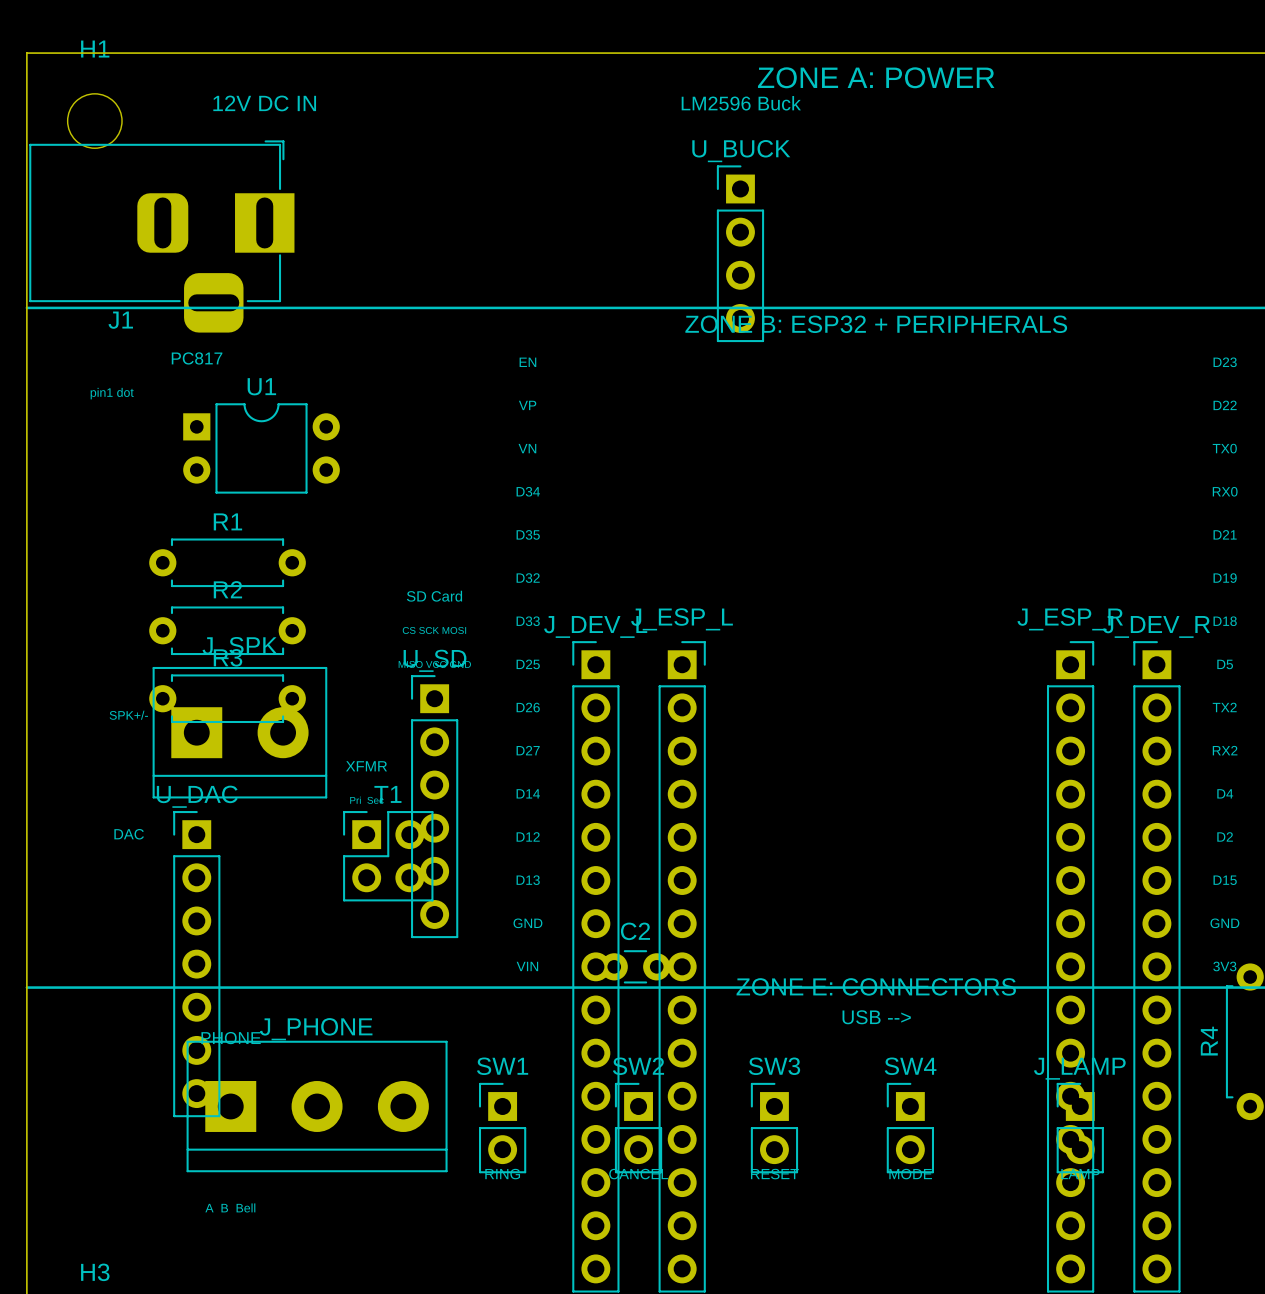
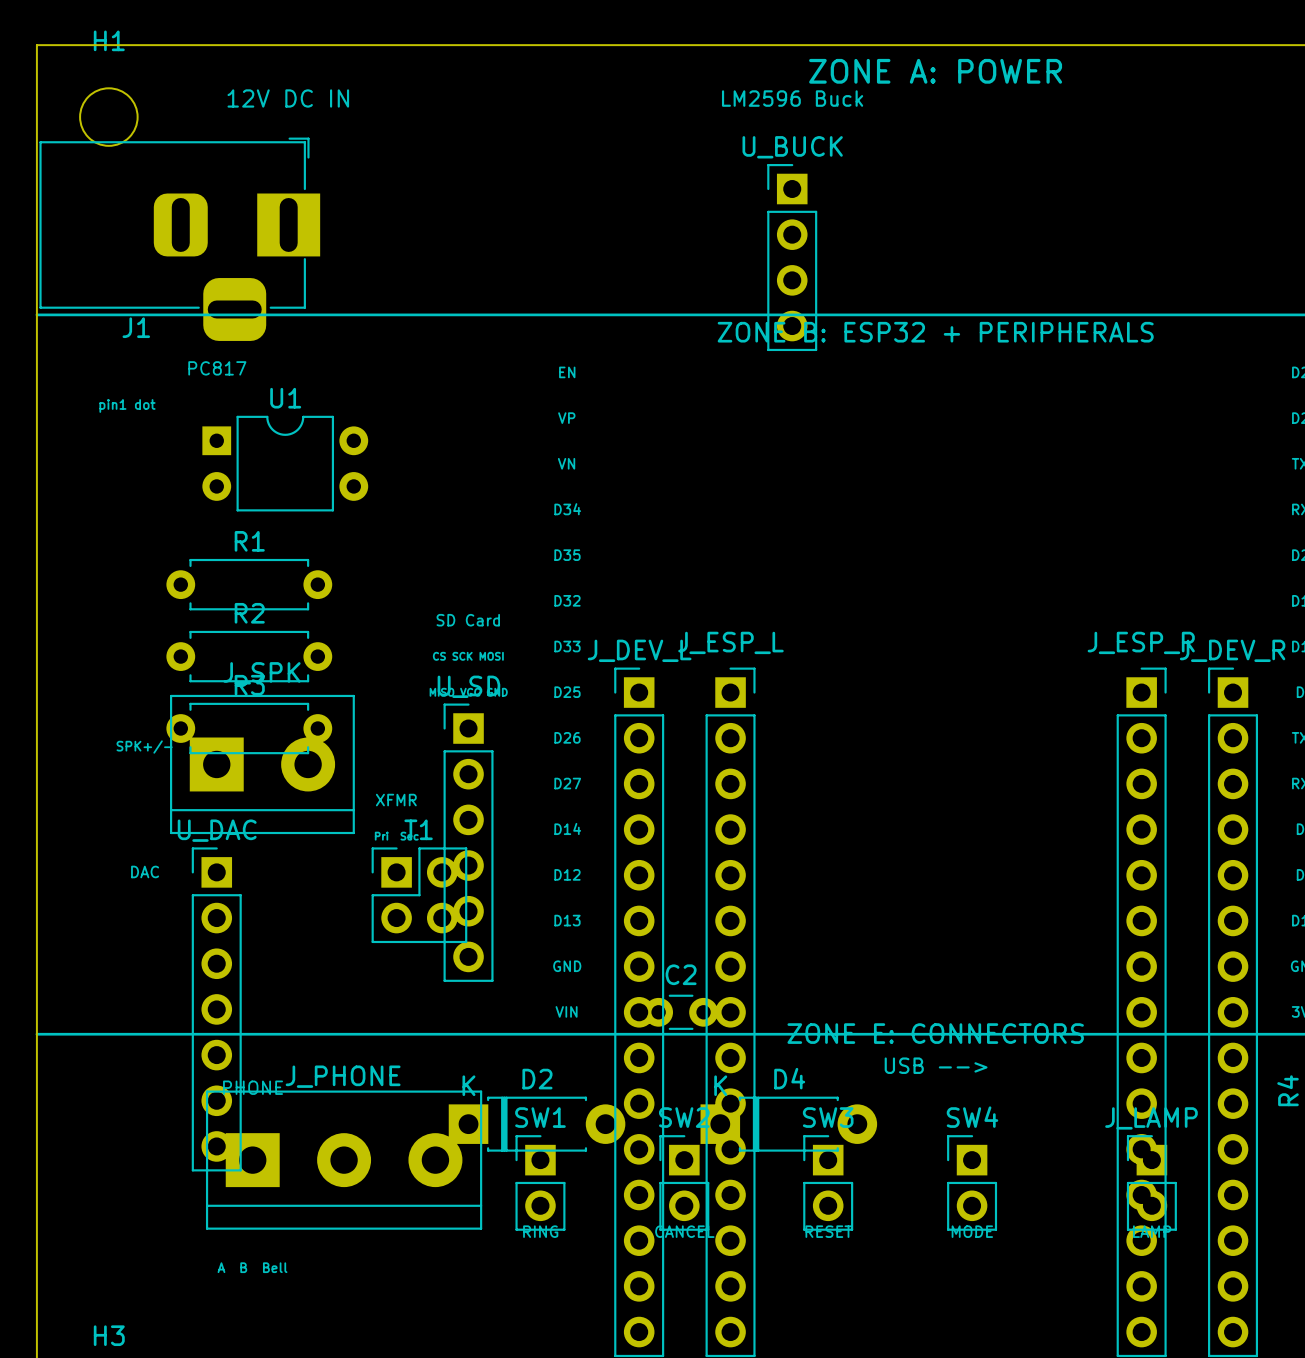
D2: none -> (537, 1124)
D4: none -> (788, 1124)

